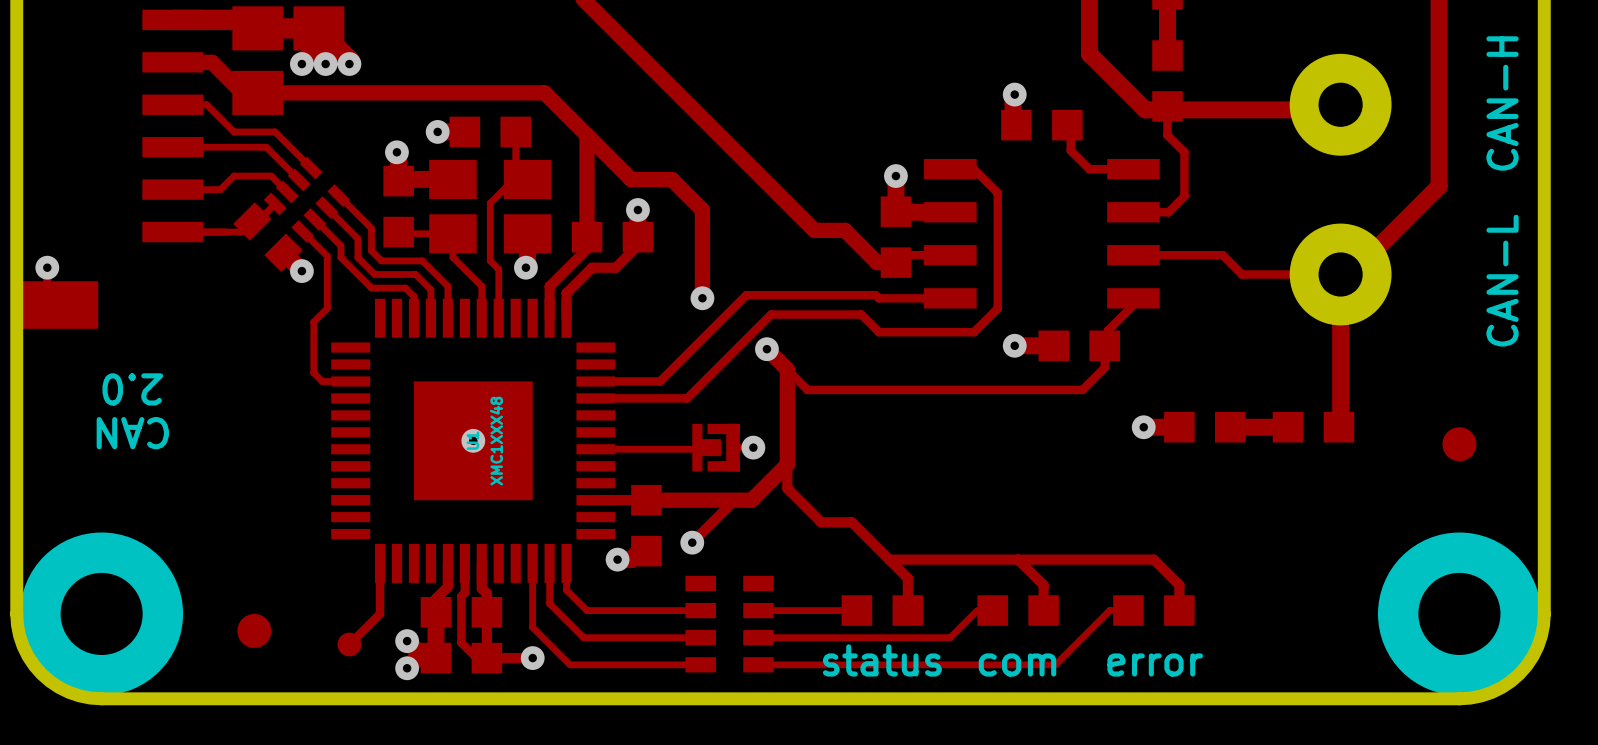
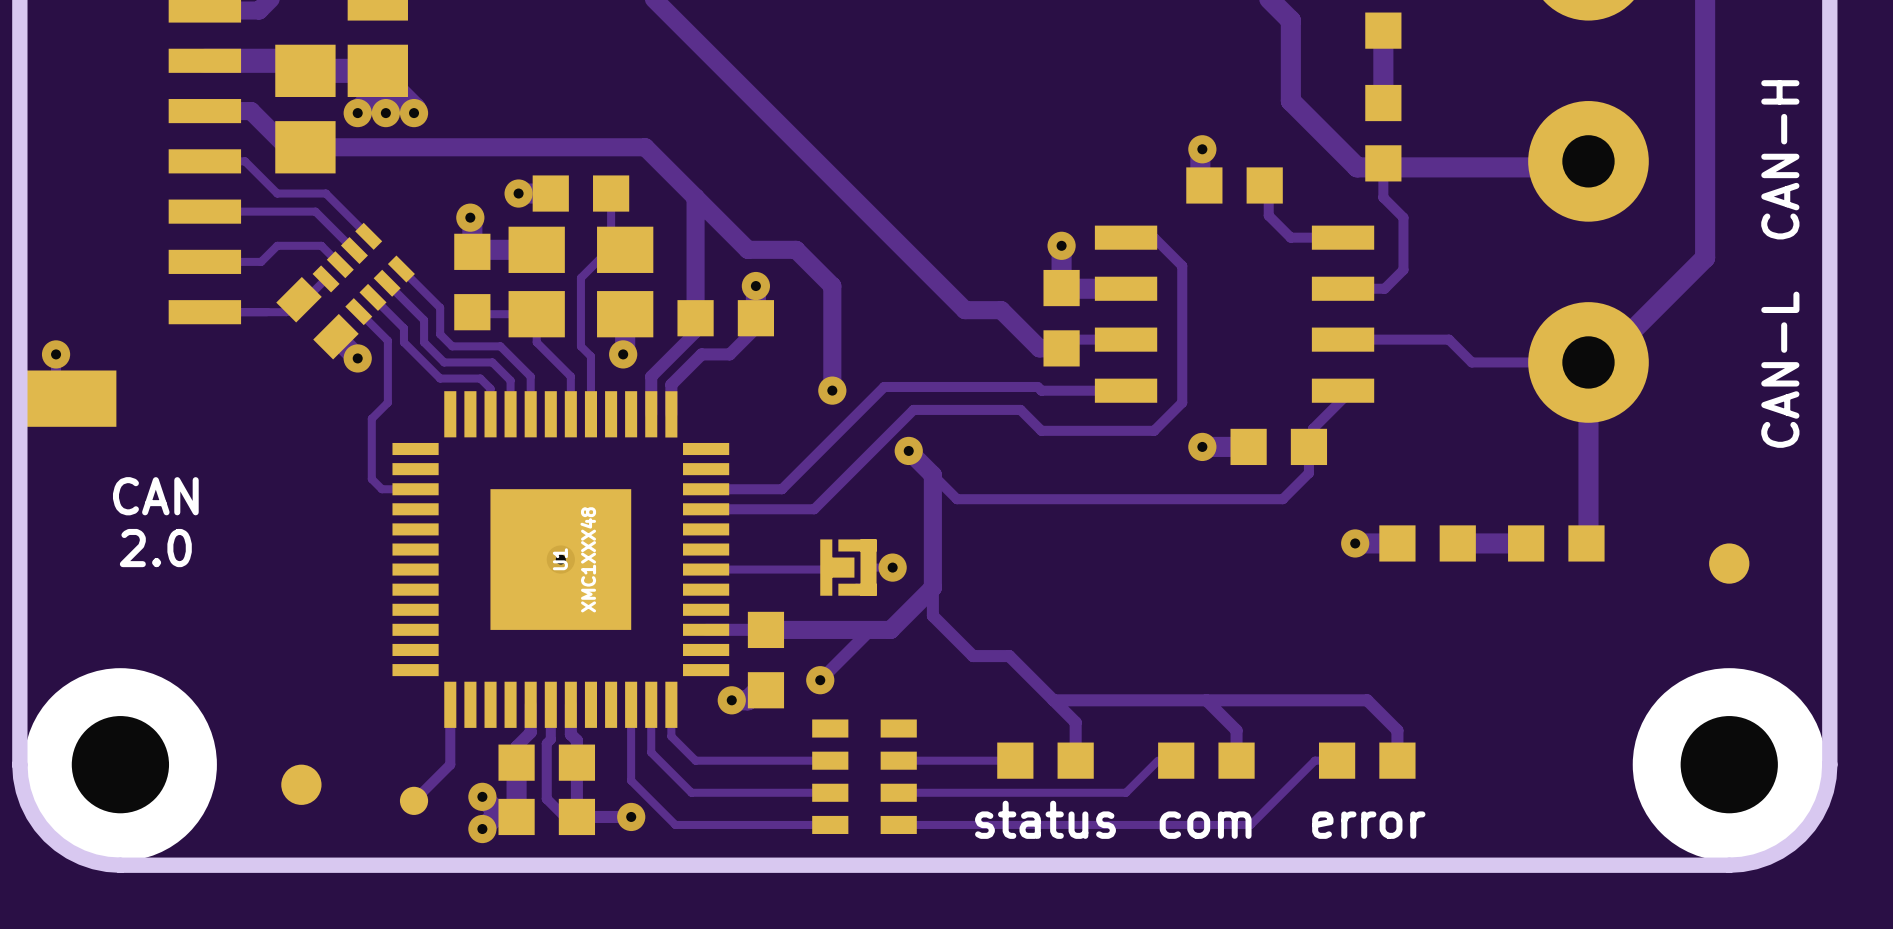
text: 2.0 (132, 389) -> CAN (155, 496)
text: CAN (132, 433) -> 2.0 (155, 548)

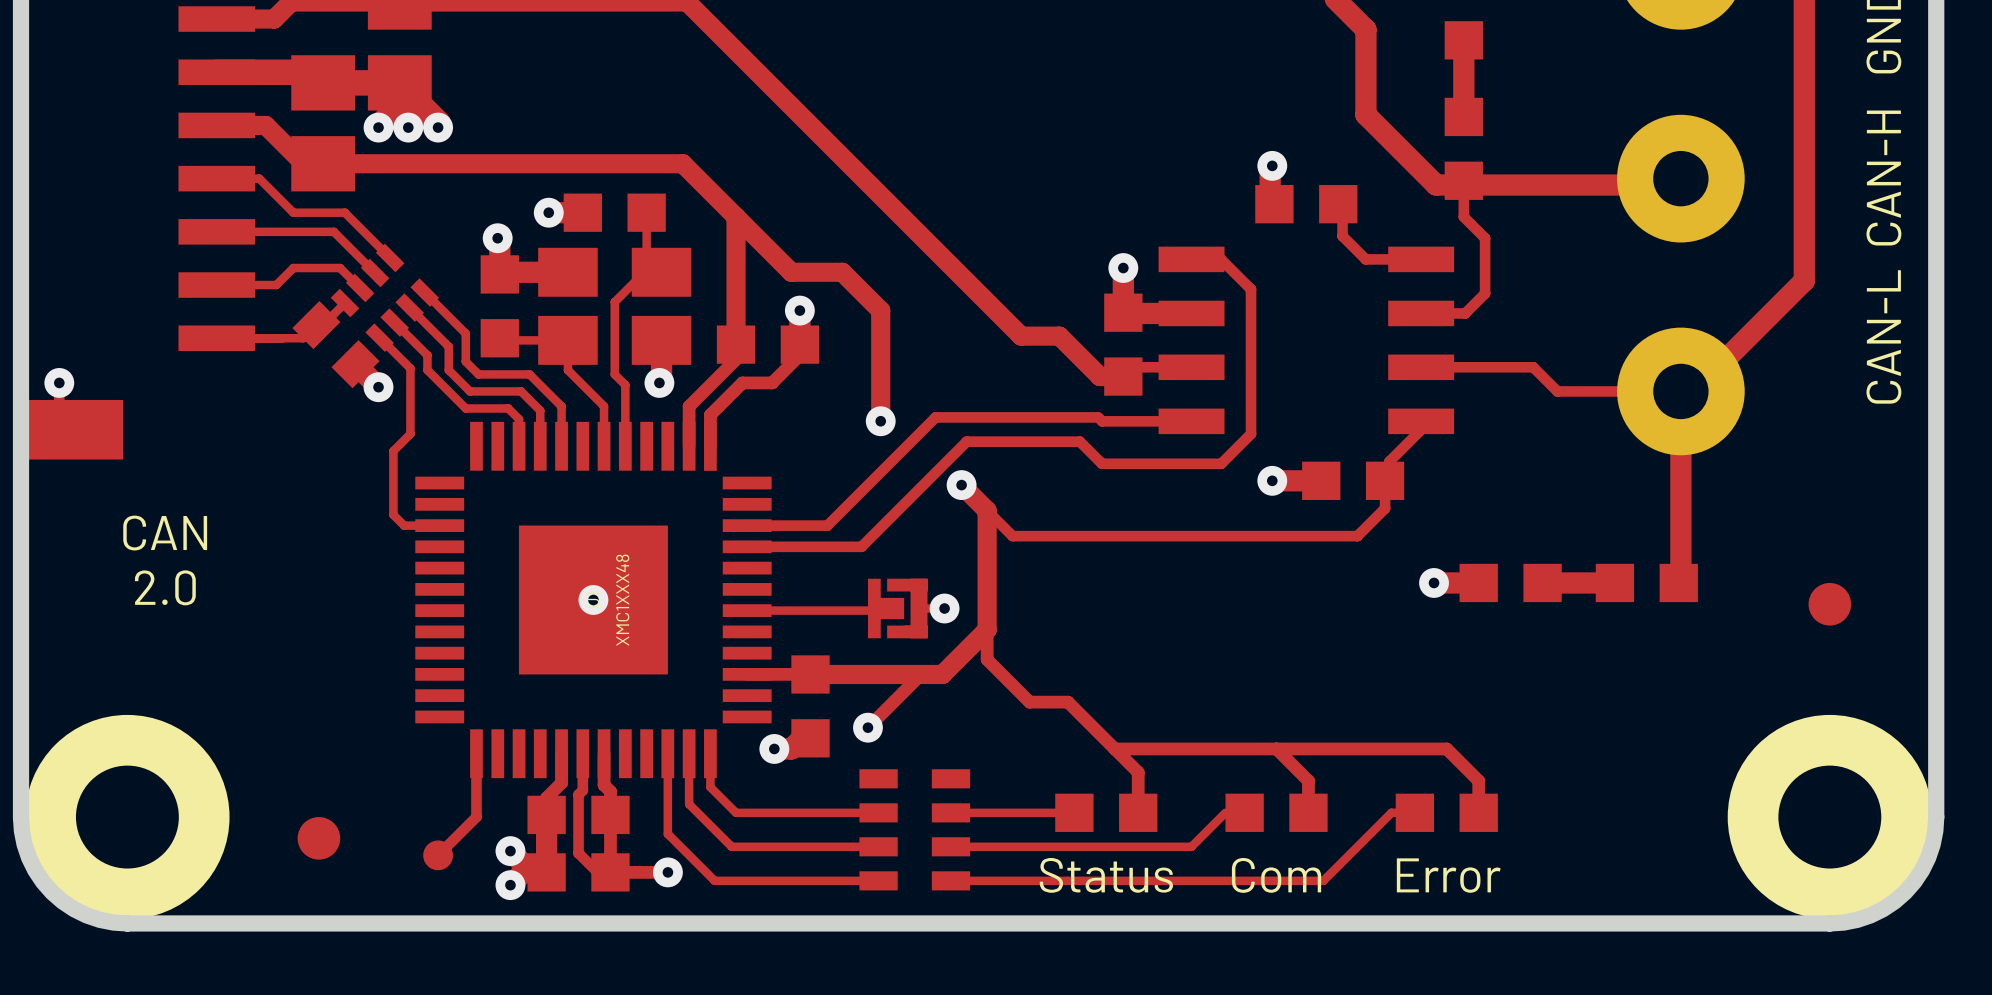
text: status (1045, 819) -> Status (1106, 875)
text: com (1205, 825) -> Com (1276, 875)
text: error (1368, 825) -> Error (1448, 875)

